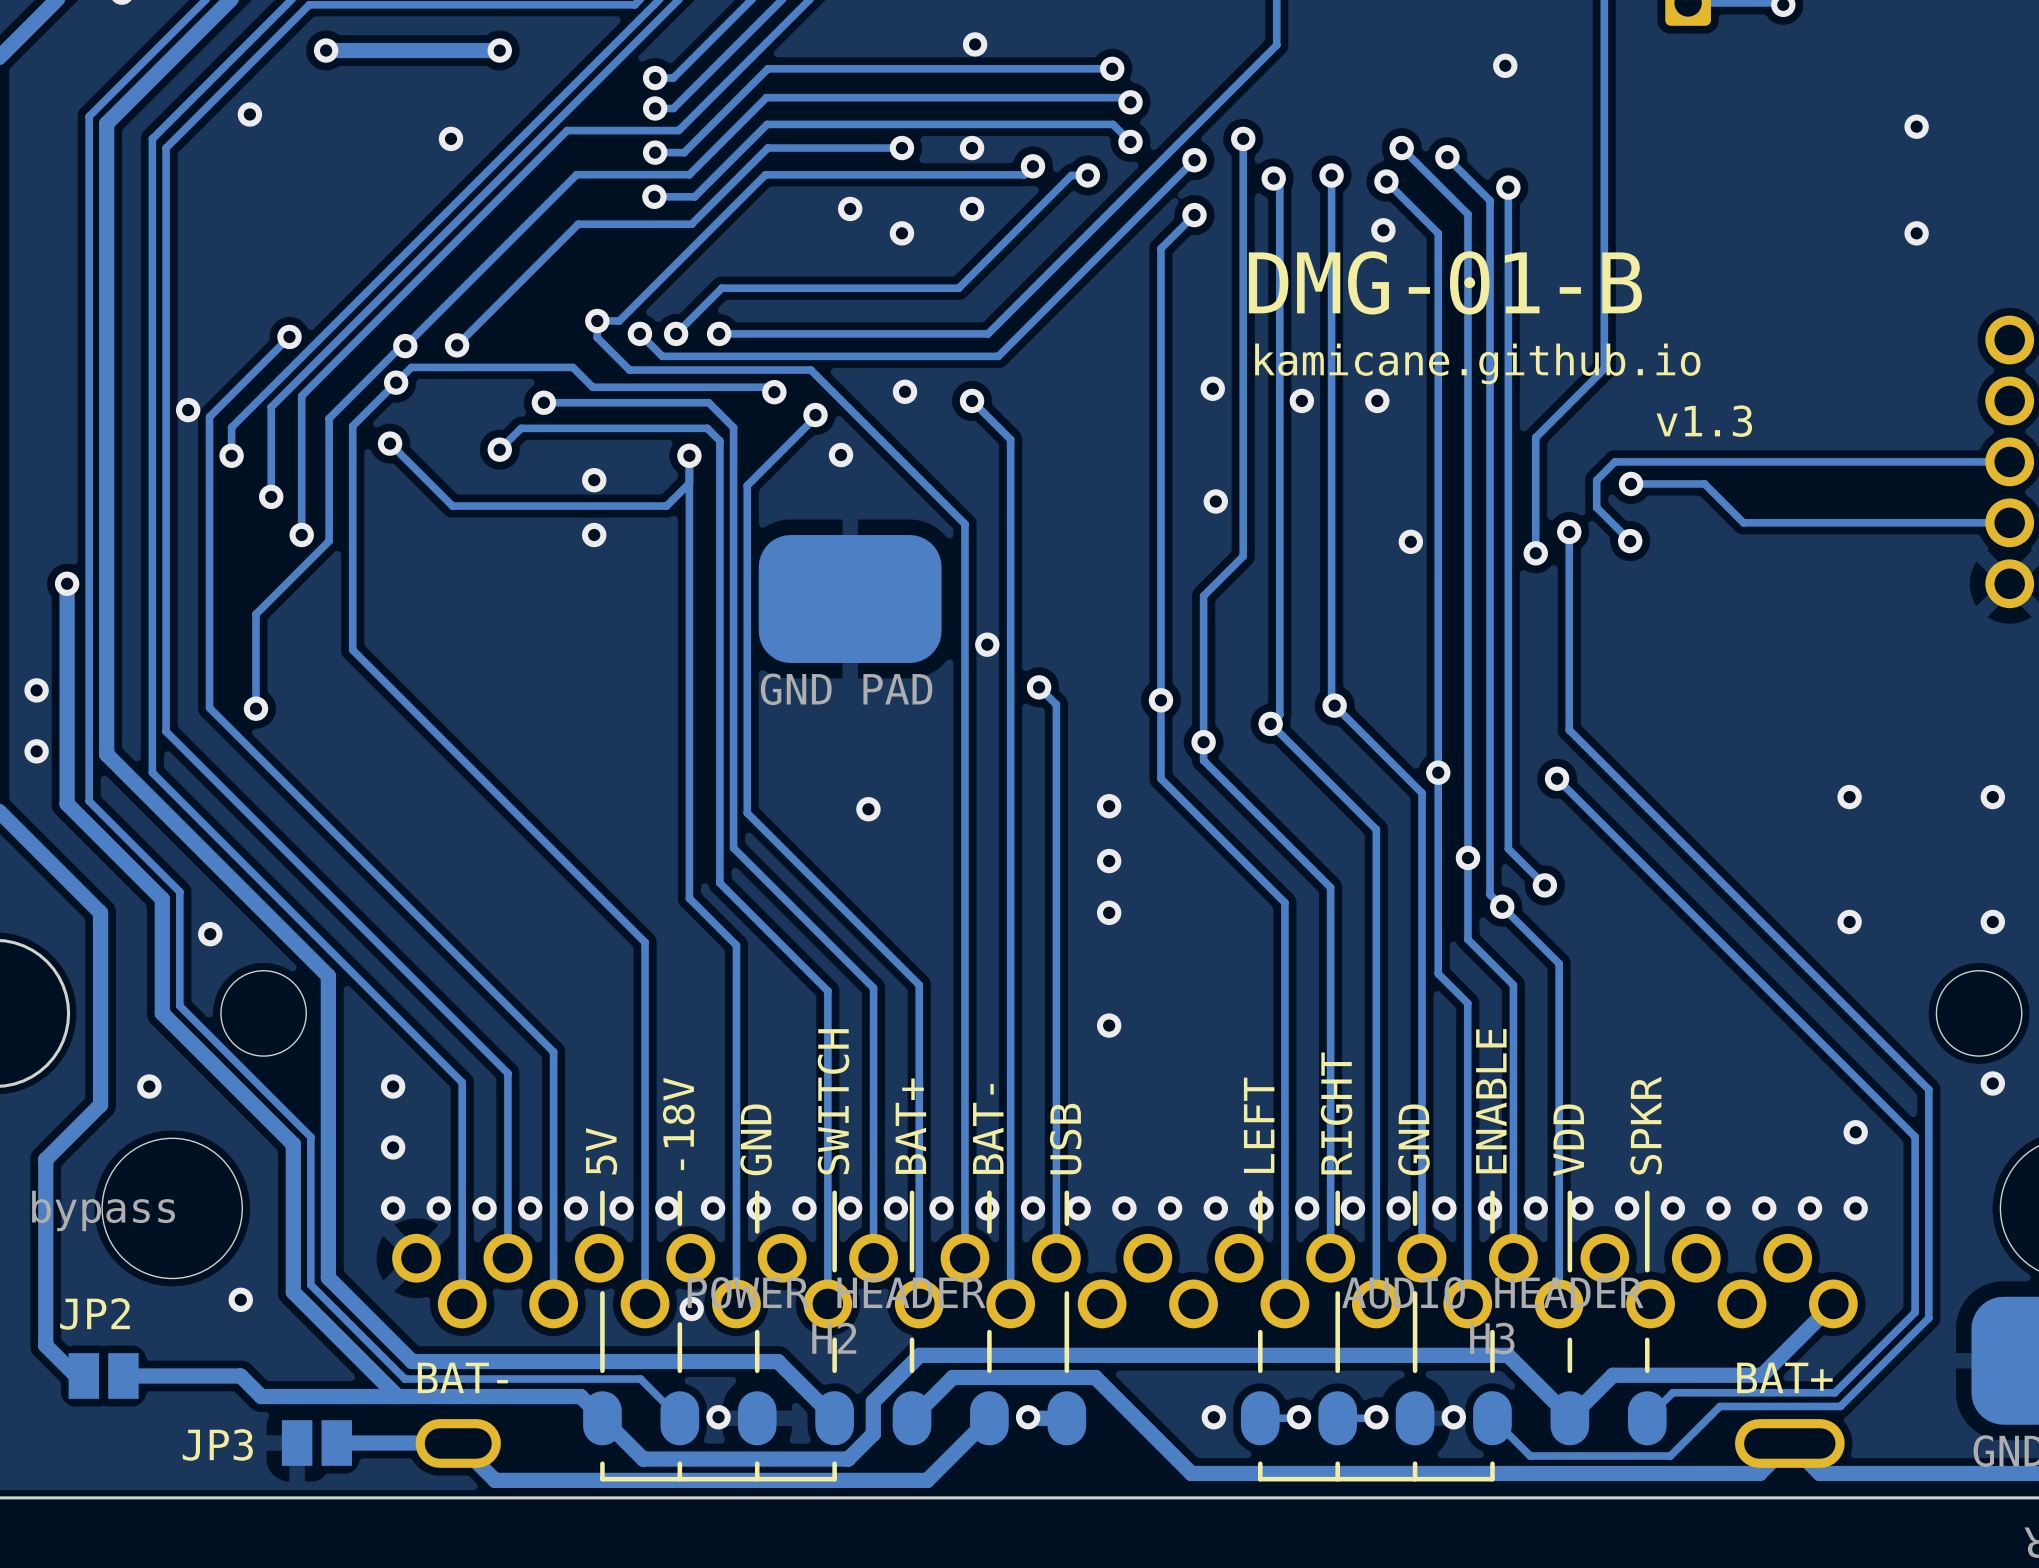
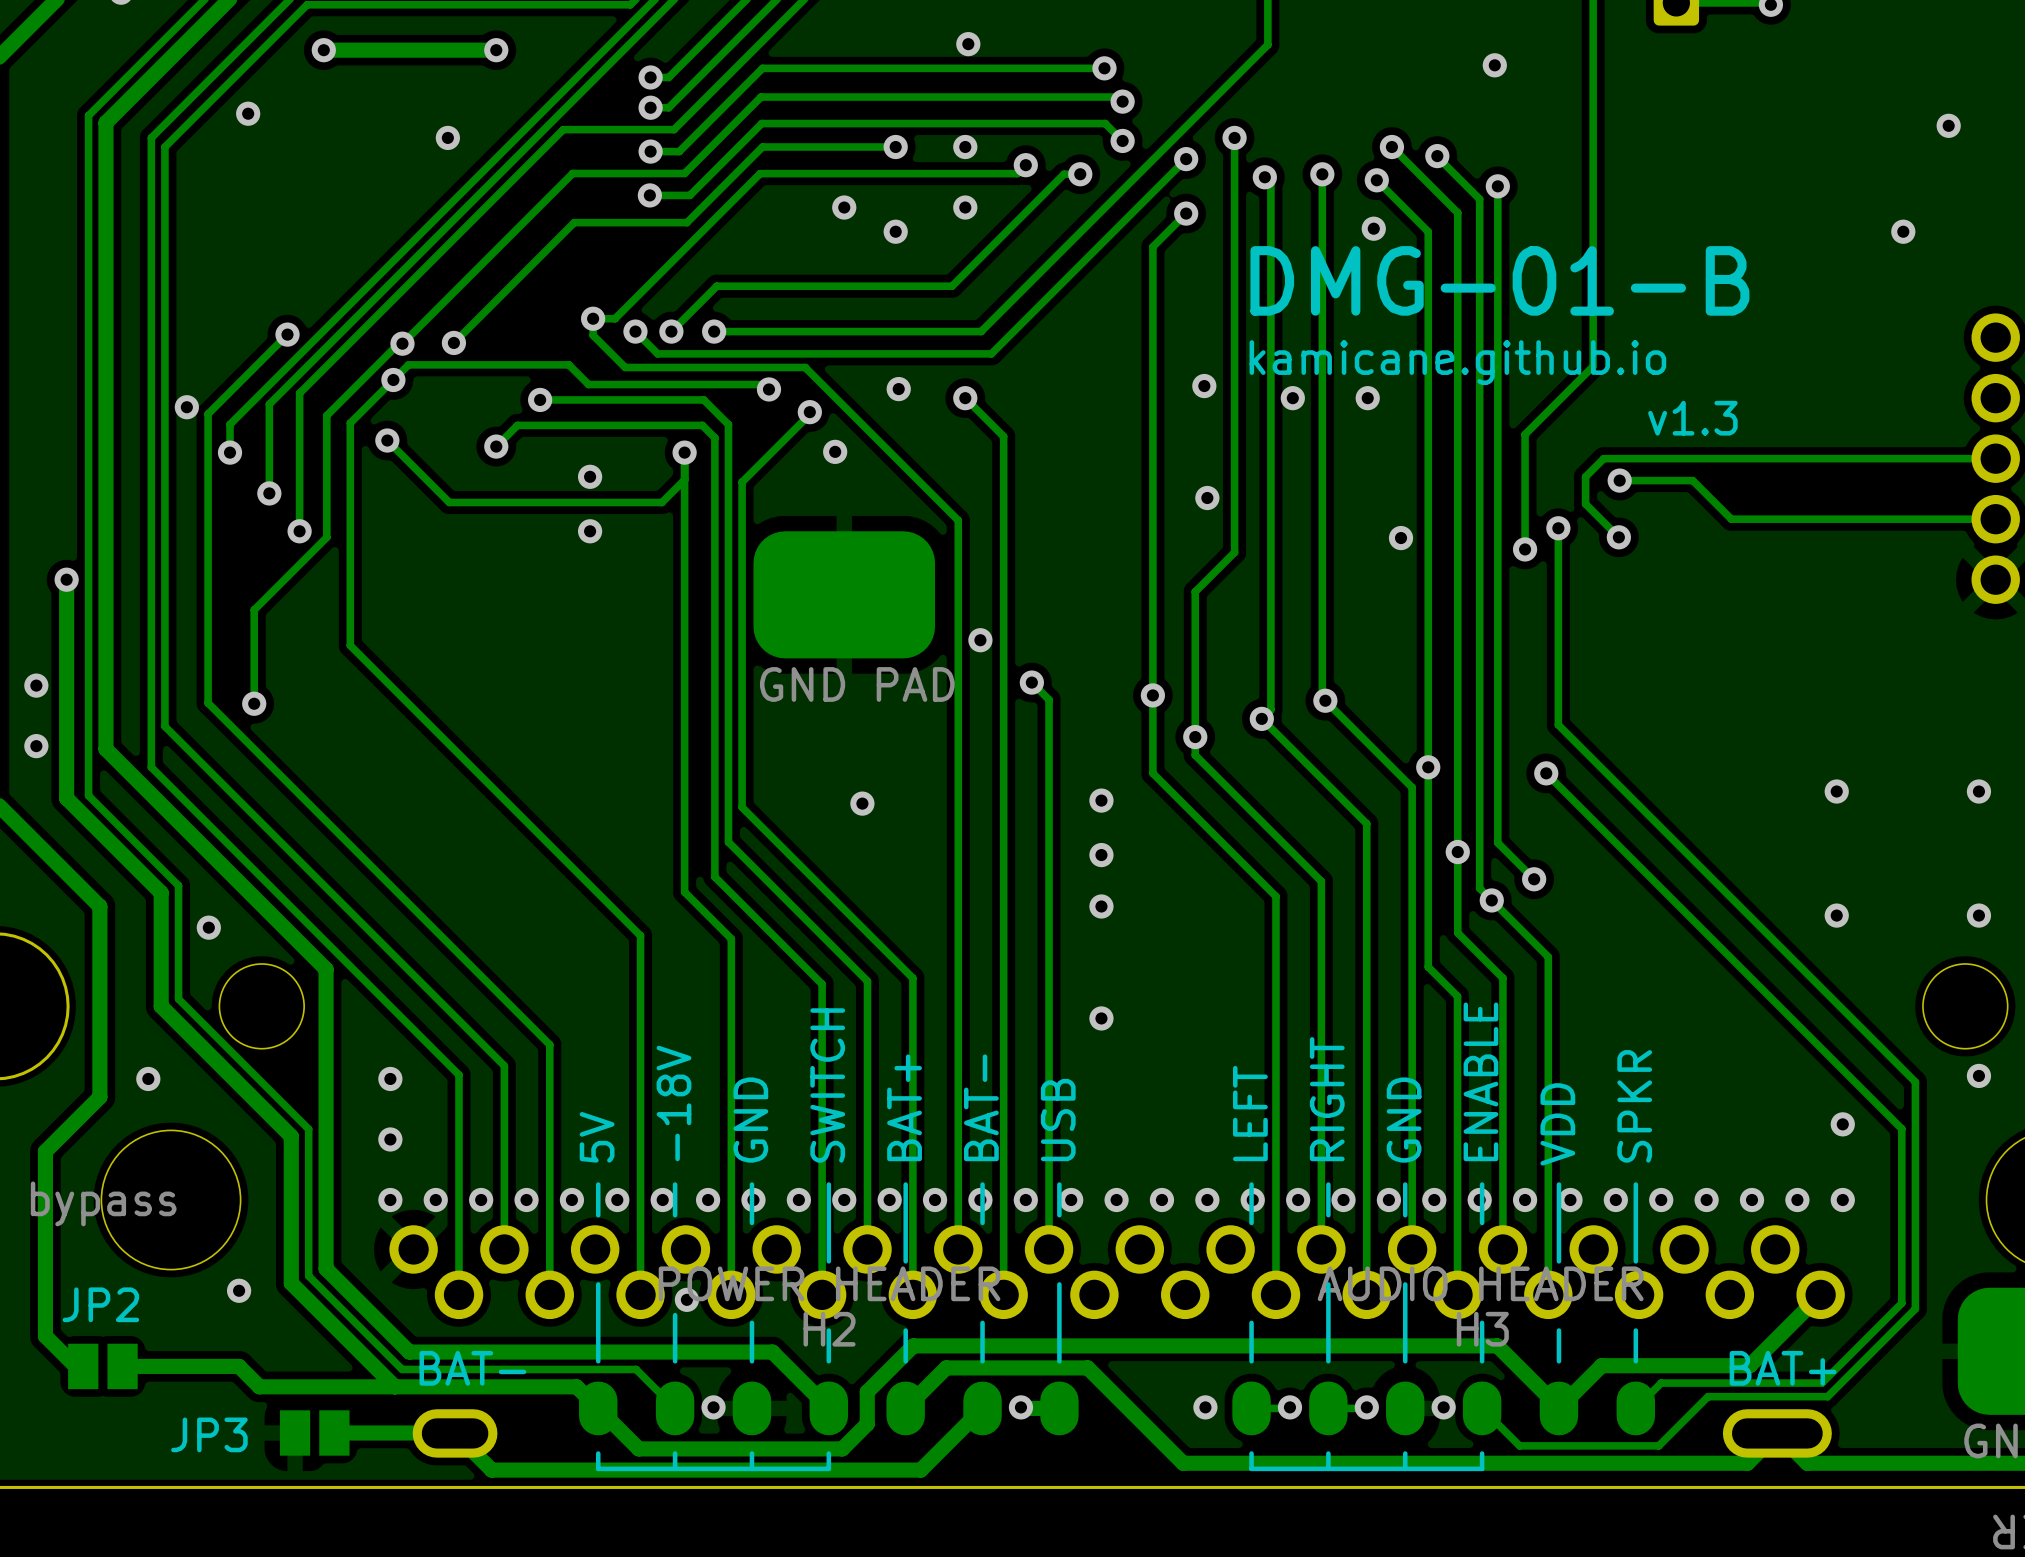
via position: (1916, 126) -> (1948, 125)

